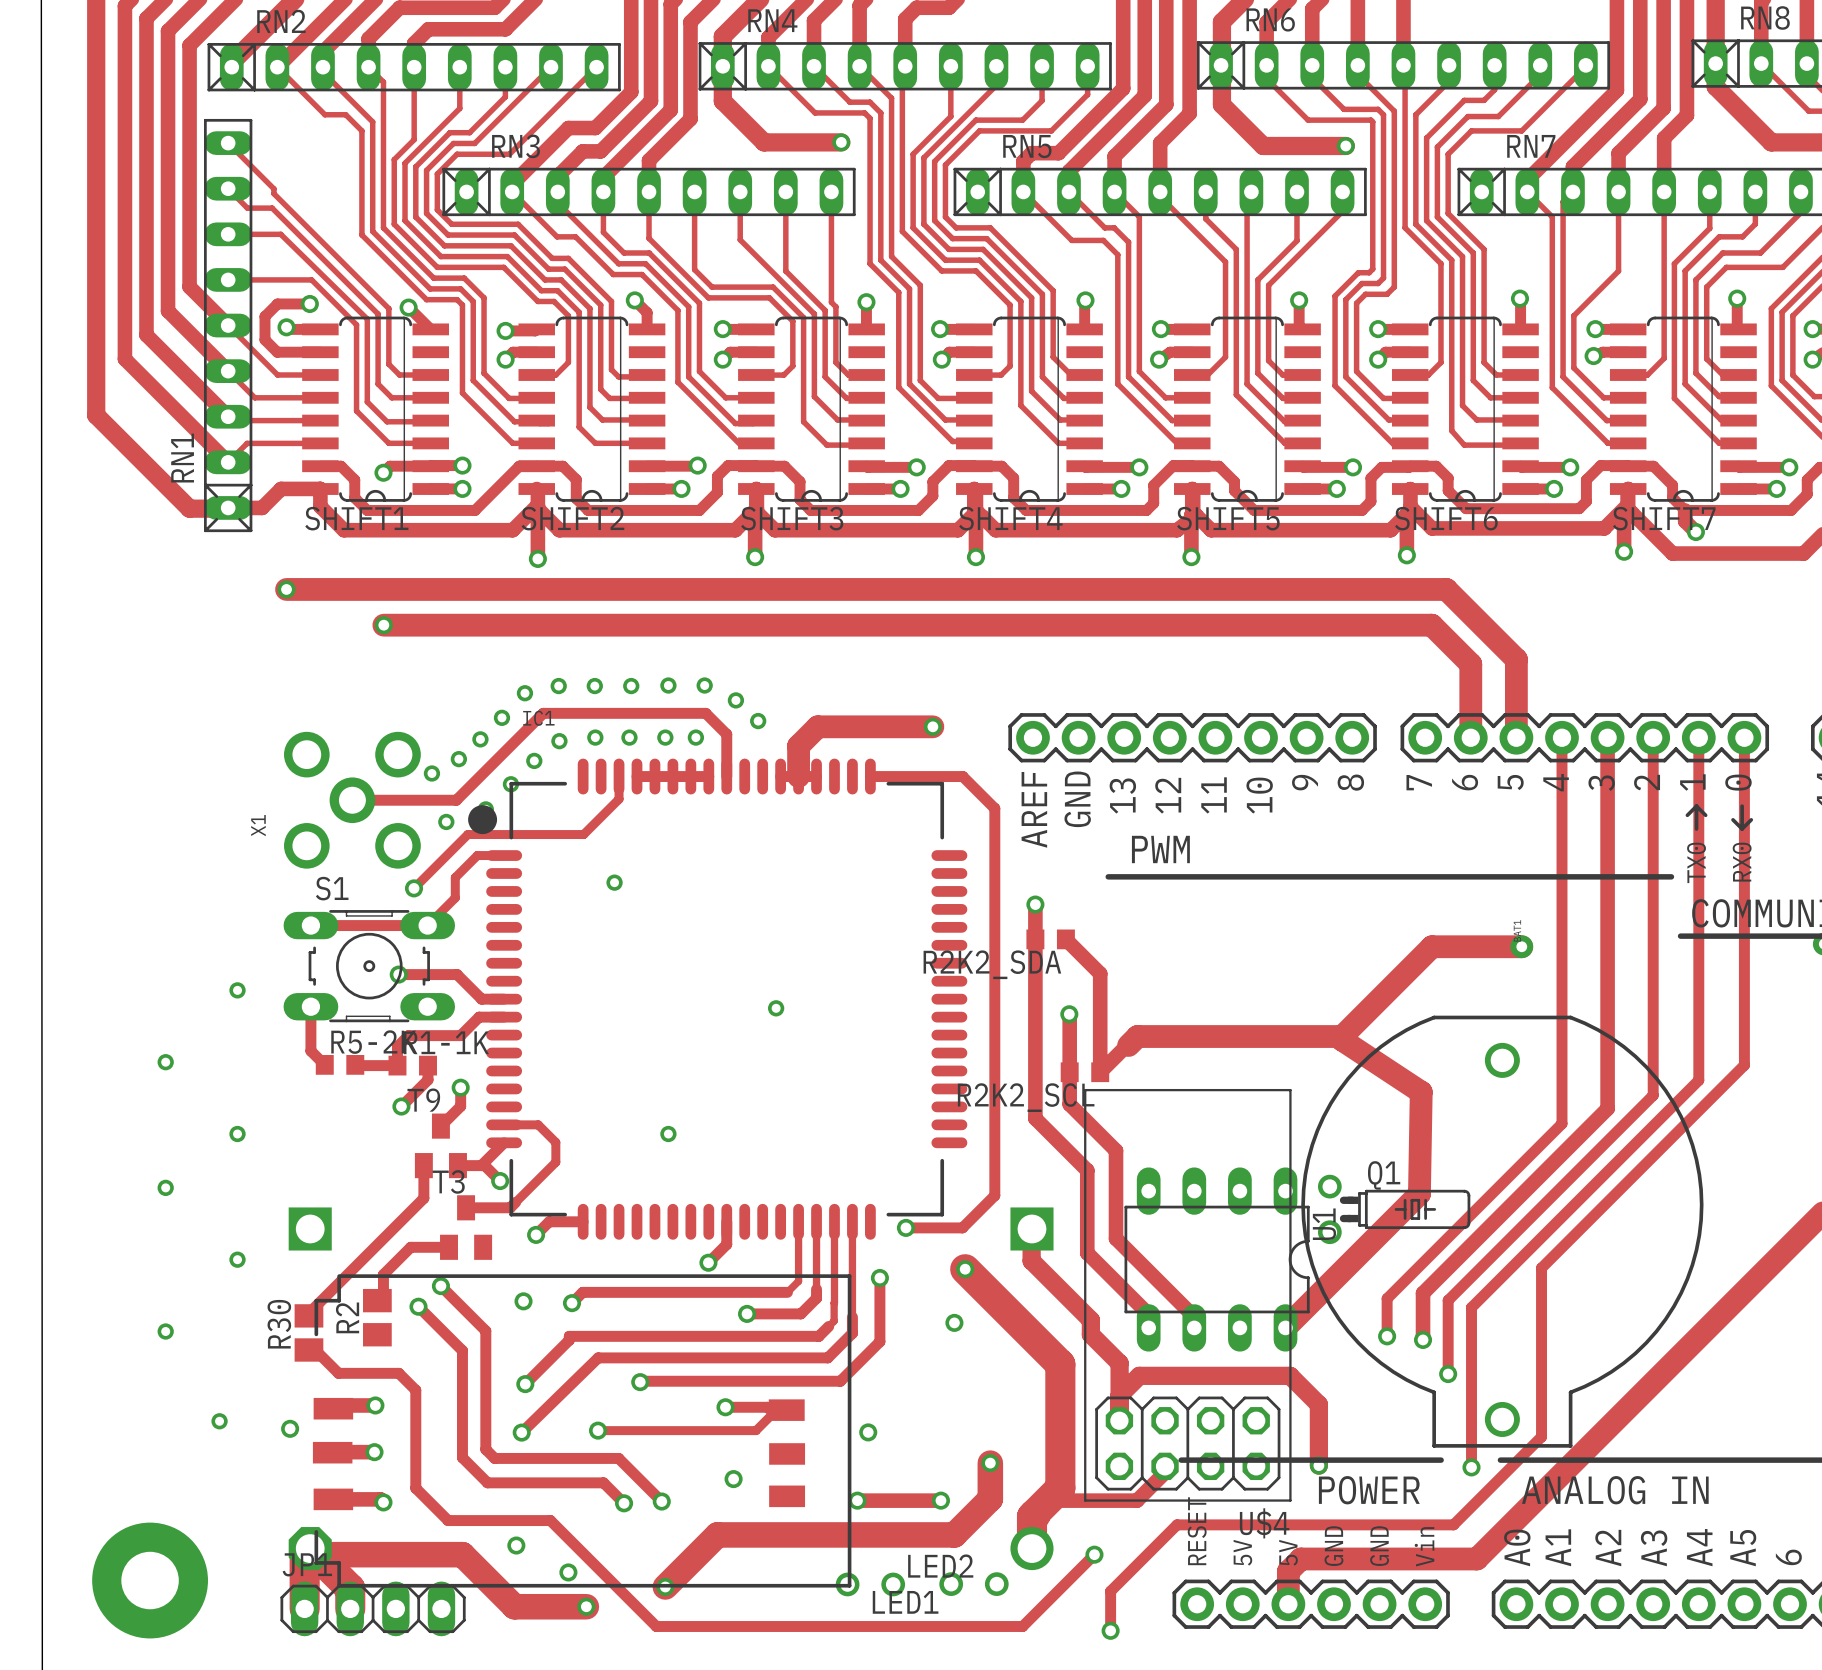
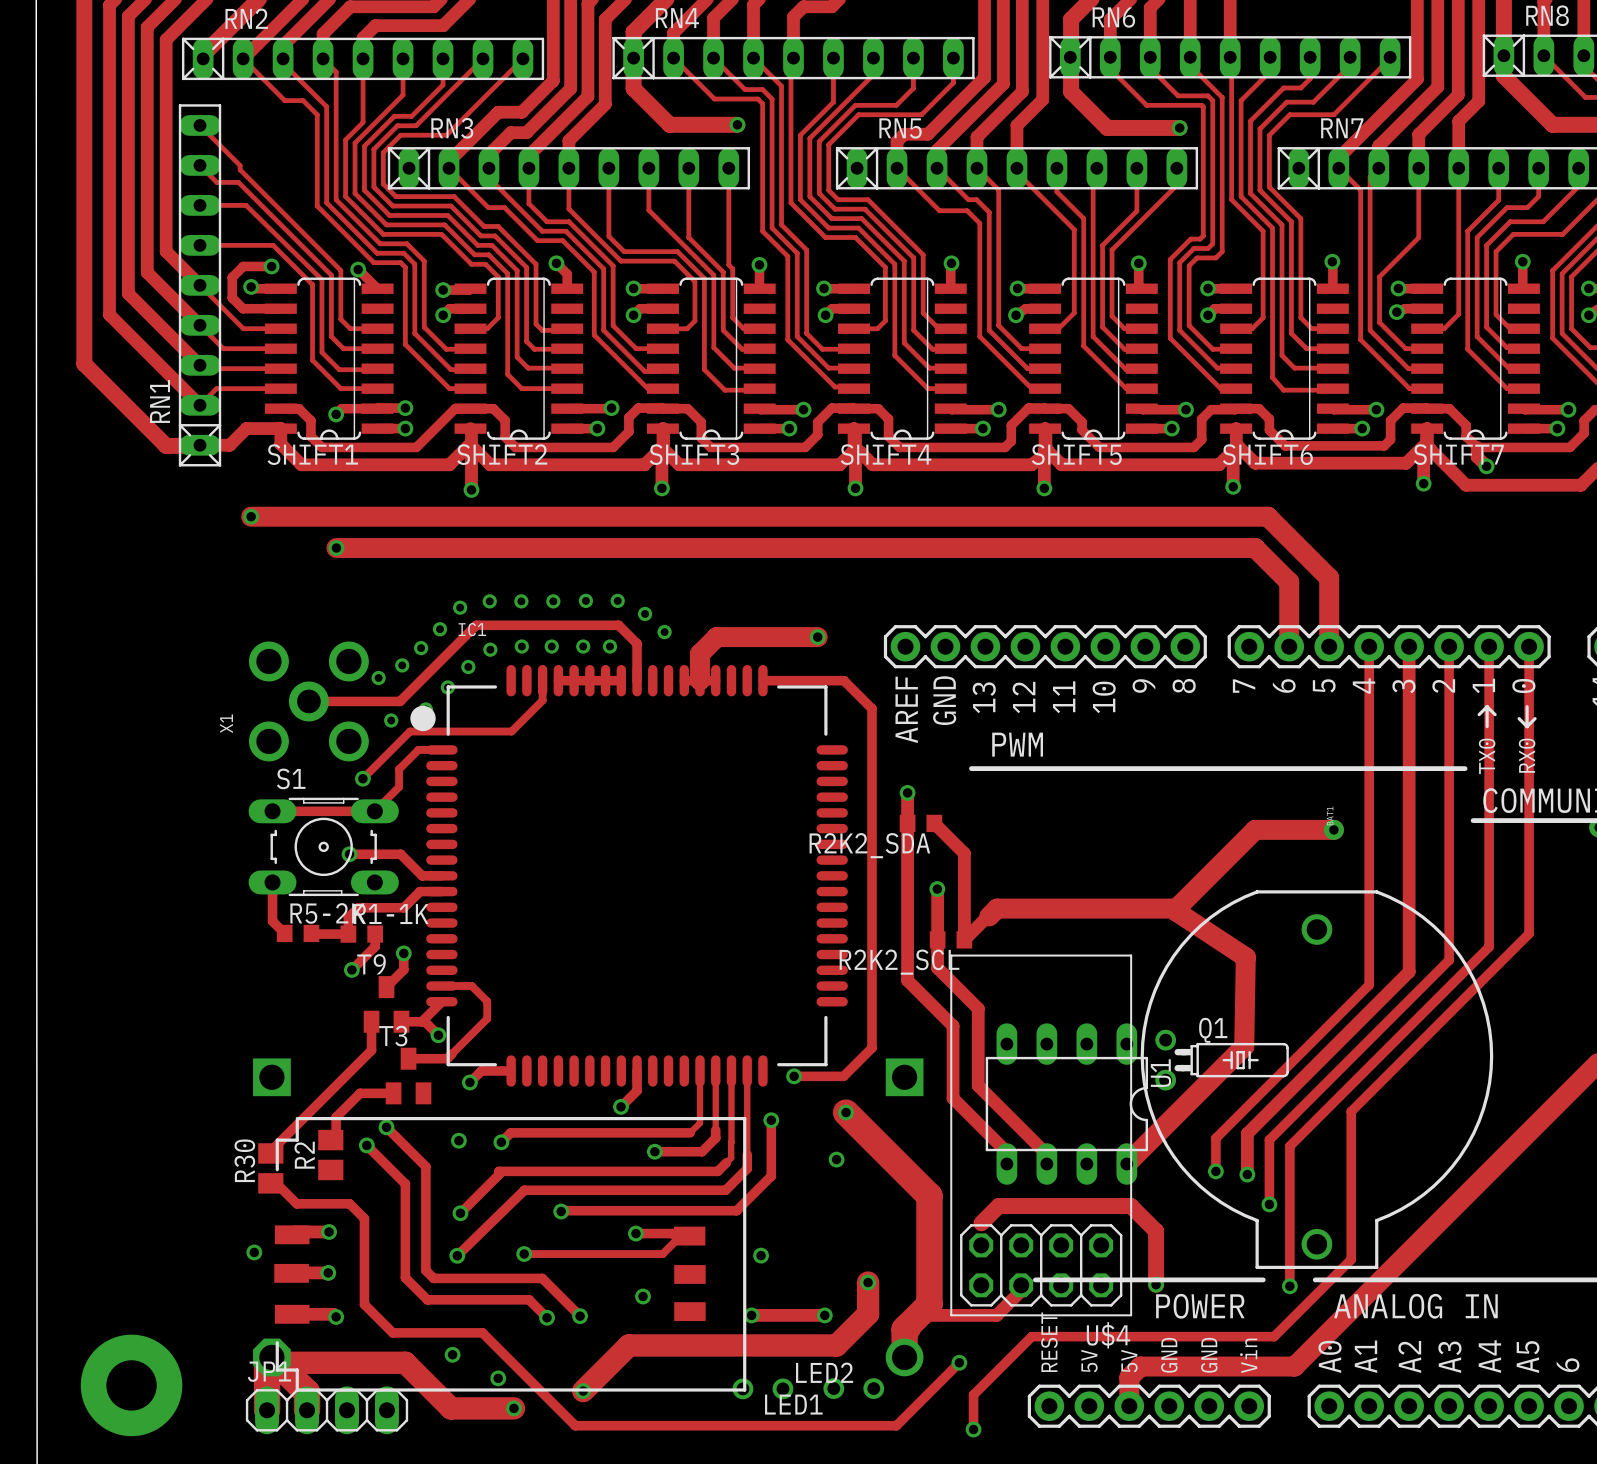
via: (614, 882) -> none
via: (237, 990) -> none
via: (776, 1008) -> none
via: (165, 1062) -> none
via: (237, 1134) -> none
via: (668, 1134) -> none
via: (165, 1187) -> none
track: (1031, 1230) (1031, 1260) (1090, 1320) (1090, 1334) (1119, 1363) (1119, 1420) -> none
via: (237, 1259) -> none
via: (165, 1331) -> none
via: (219, 1421) -> none

